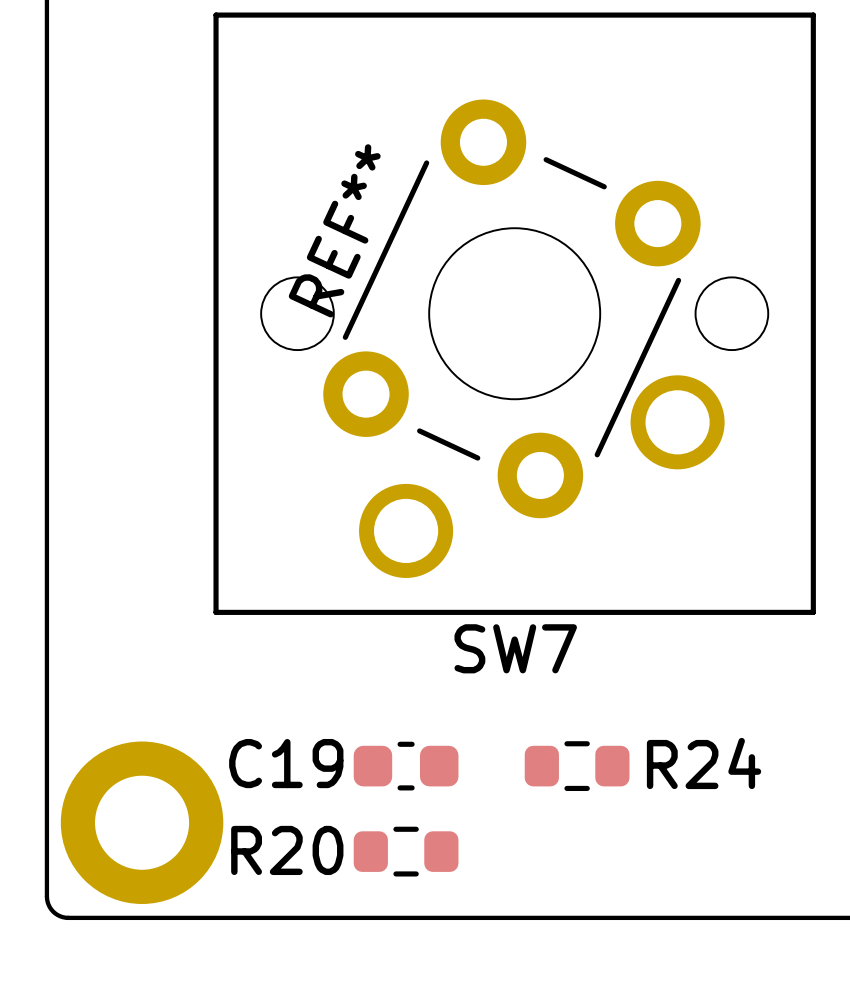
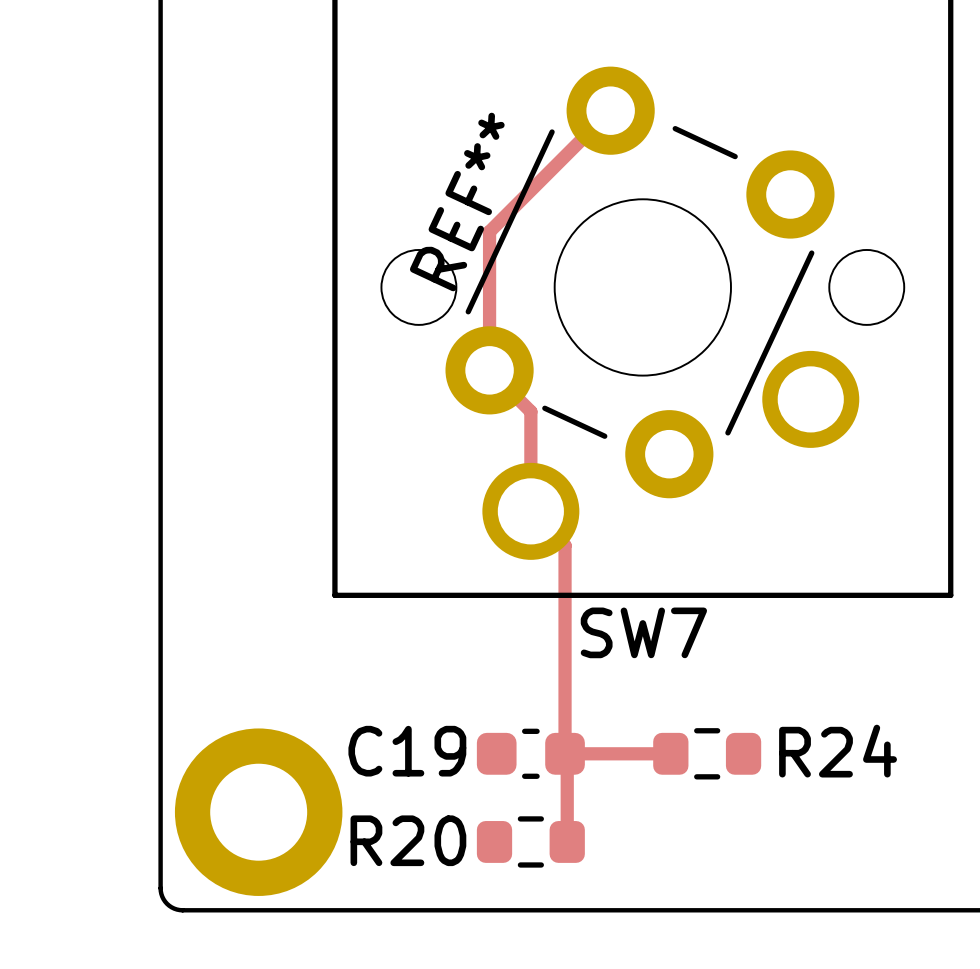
top track: none -> (610, 110) (489, 231) (489, 370) (530, 411) (530, 511) (565, 545) (565, 753)
top track: none -> (565, 753) (567, 756) (567, 841)
top track: none -> (565, 753) (670, 753)

